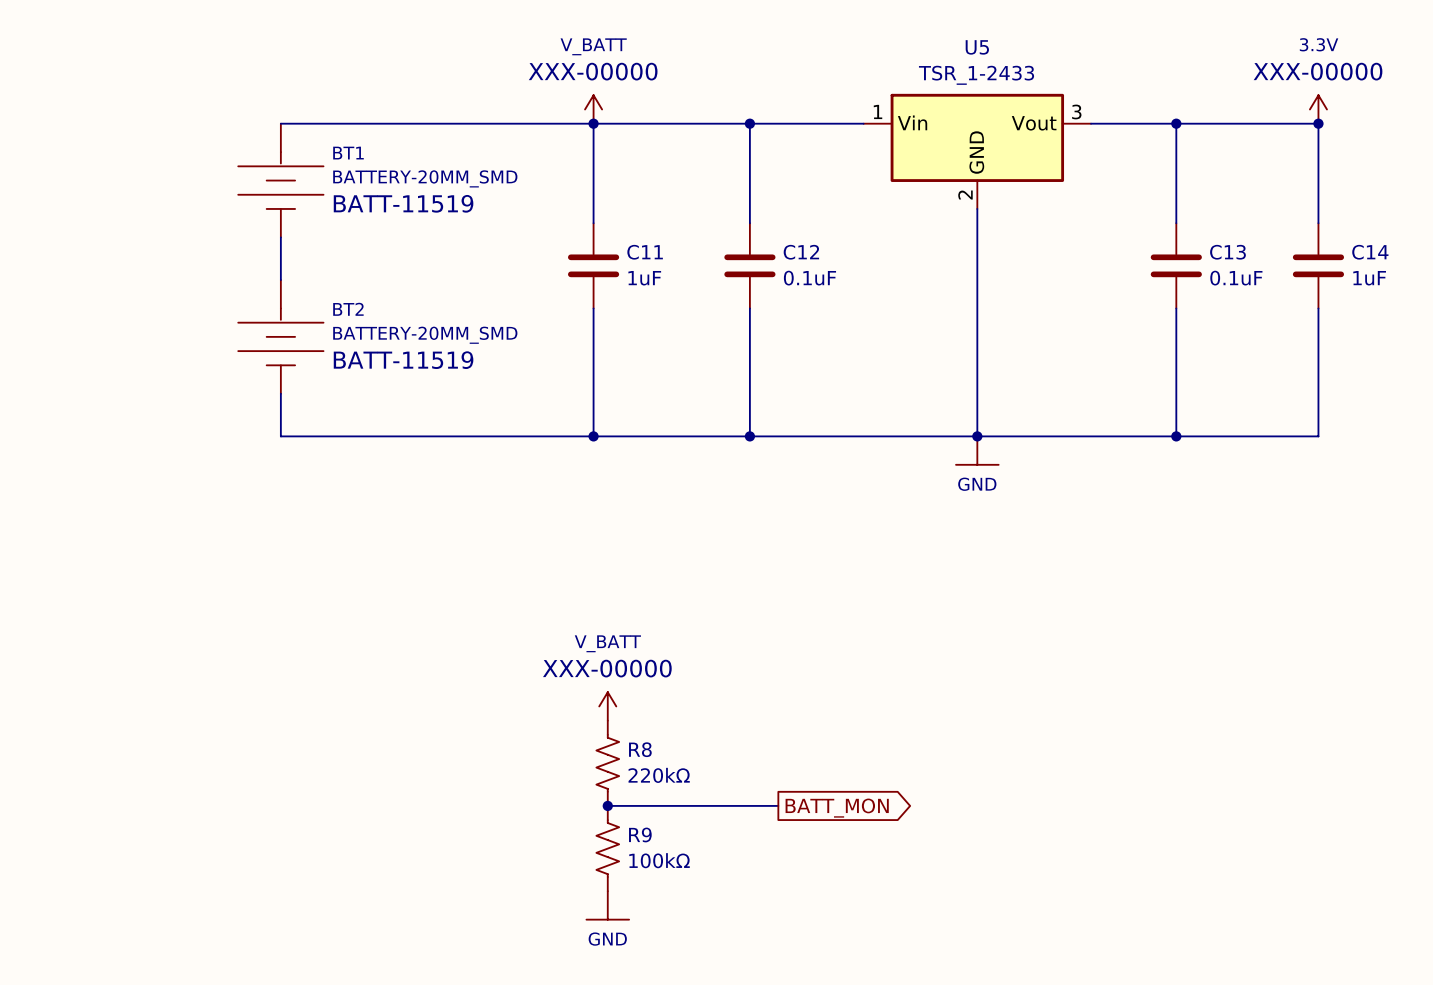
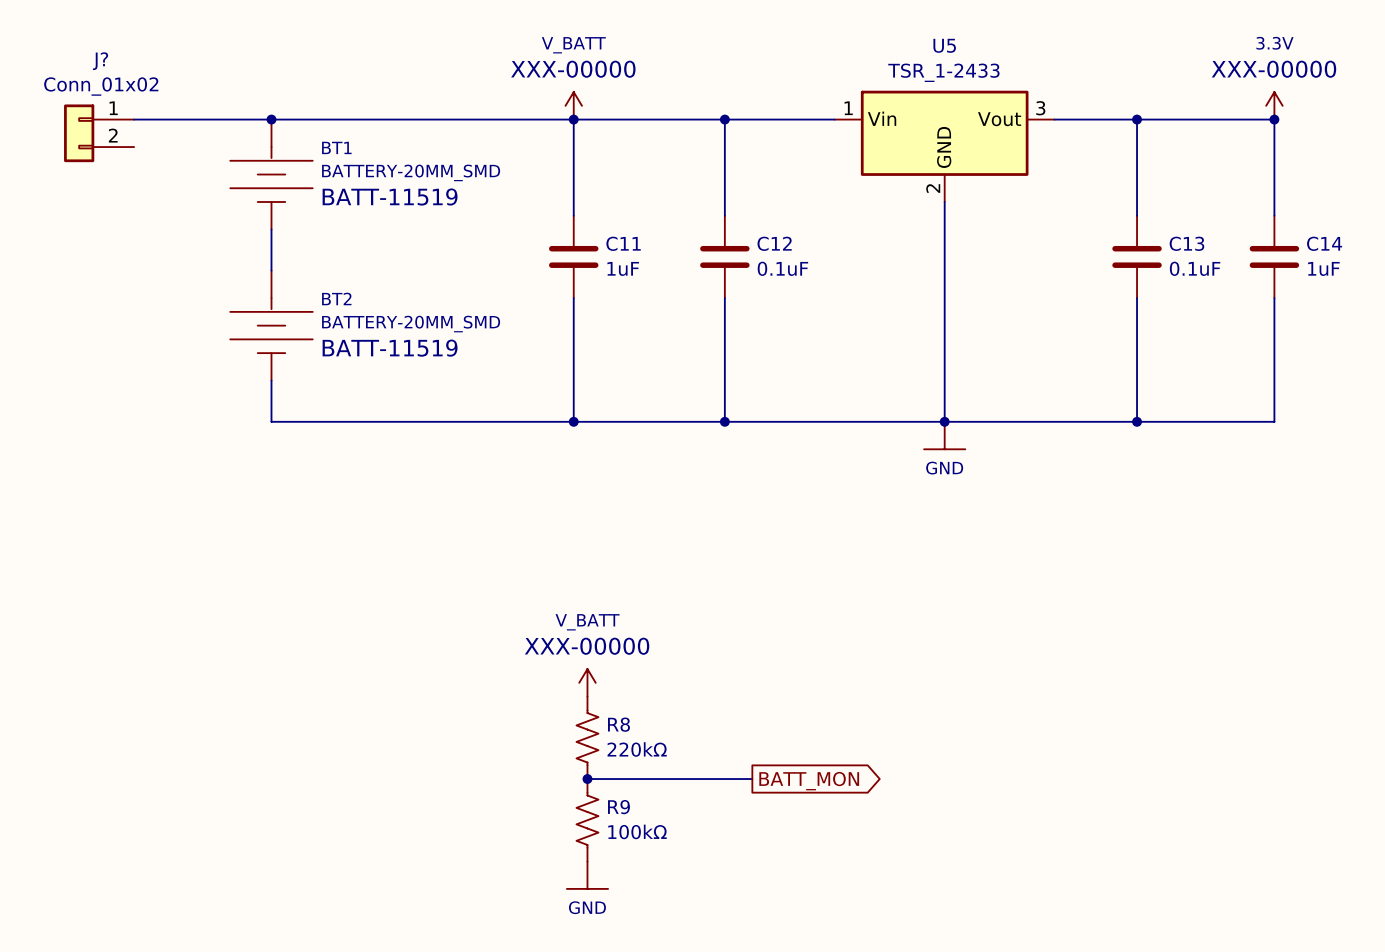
wire: none -> (134, 119) (271, 119)
junction: none -> (271, 119)
J?: none -> Conn_01x02 (99, 133)

